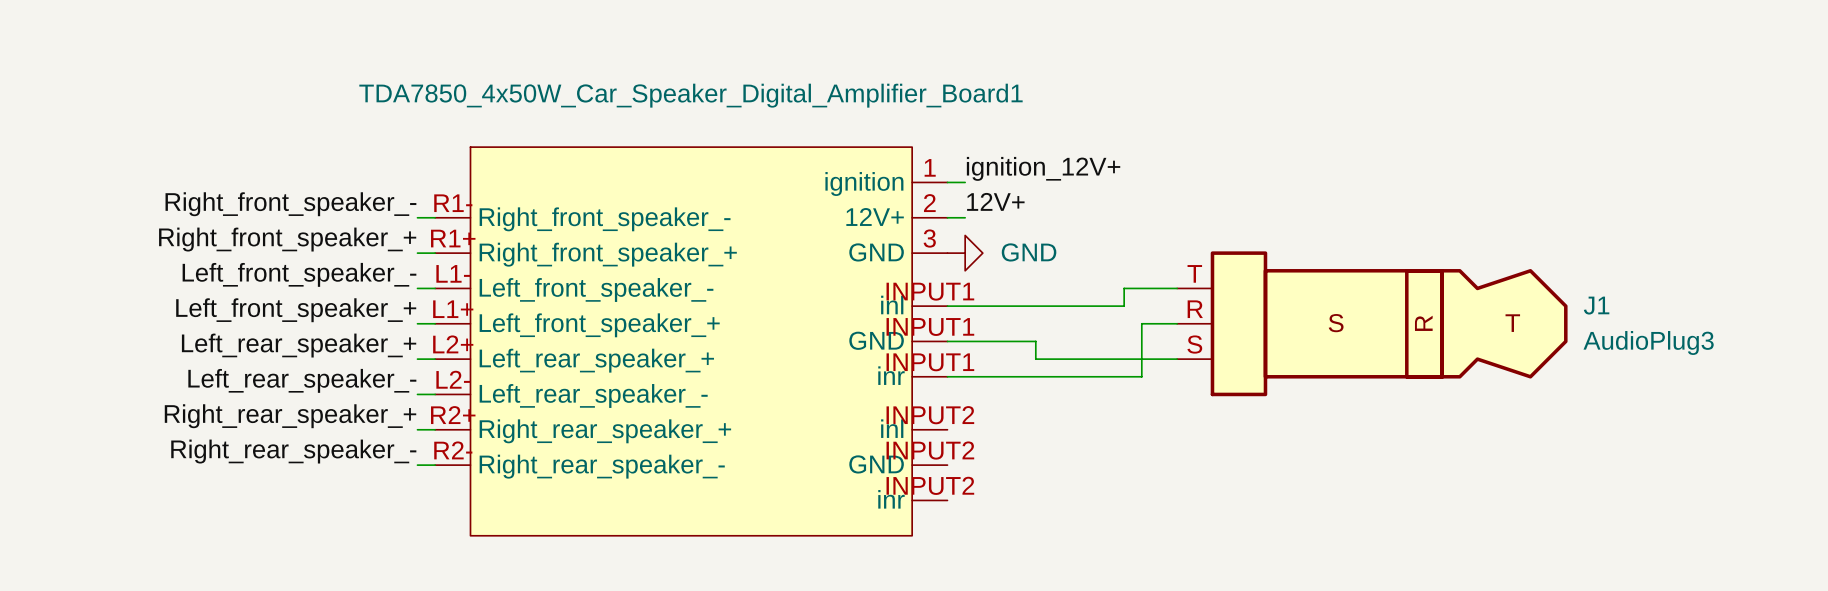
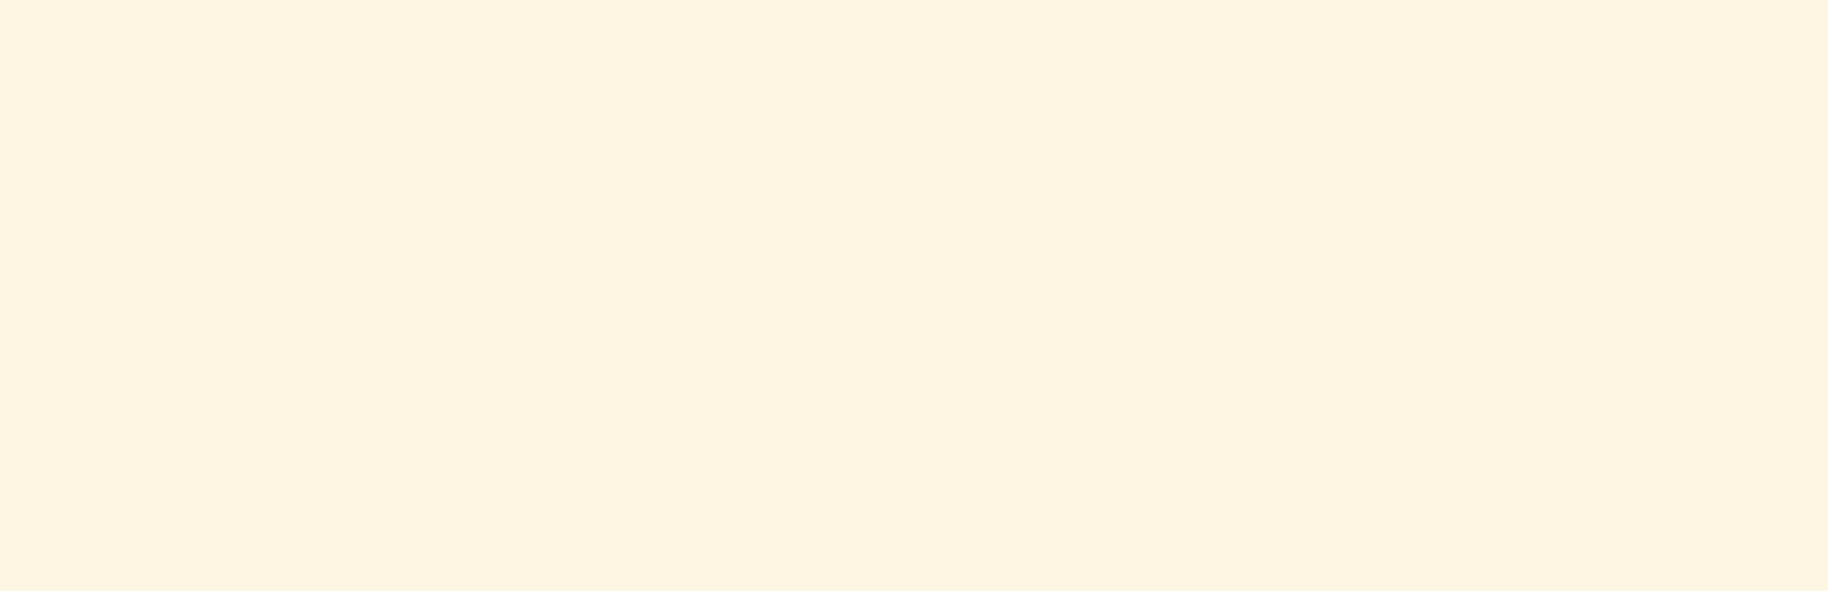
label: ignition_12V+ (1043, 168) -> none
wire: (947, 182) (965, 182) -> none
label: 12V+ (995, 201) -> none
label: Right_front_speaker_- (290, 204) -> none
wire: (417, 217) (435, 217) -> none
wire: (947, 217) (965, 217) -> none
label: Right_front_speaker_+ (287, 239) -> none
wire: (417, 253) (435, 253) -> none
power symbol: GND (965, 253) -> none
label: Left_front_speaker_- (299, 274) -> none
wire: (417, 288) (435, 288) -> none
wire: (1177, 288) (1124, 288) (1124, 306) (947, 306) -> none
label: Left_front_speaker_+ (296, 310) -> none
wire: (417, 323) (435, 323) -> none
wire: (1177, 323) (1141, 323) (1141, 376) (947, 376) -> none
J1: AudioPlug3 (1372, 323) -> none
TDA7850_4x50W_Car_Speaker_Digital_Amplifier_Board1: (691, 341) -> none
wire: (947, 341) (1035, 341) (1035, 359) (1177, 359) -> none
label: Left_rear_speaker_+ (299, 345) -> none
wire: (417, 359) (435, 359) -> none
label: Left_rear_speaker_- (302, 380) -> none
wire: (417, 394) (435, 394) -> none
label: Right_rear_speaker_+ (290, 416) -> none
wire: (417, 429) (435, 429) -> none
label: Right_rear_speaker_- (293, 451) -> none
wire: (417, 465) (435, 465) -> none

